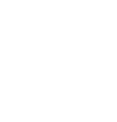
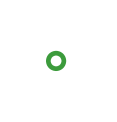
via: none -> (56, 60)

